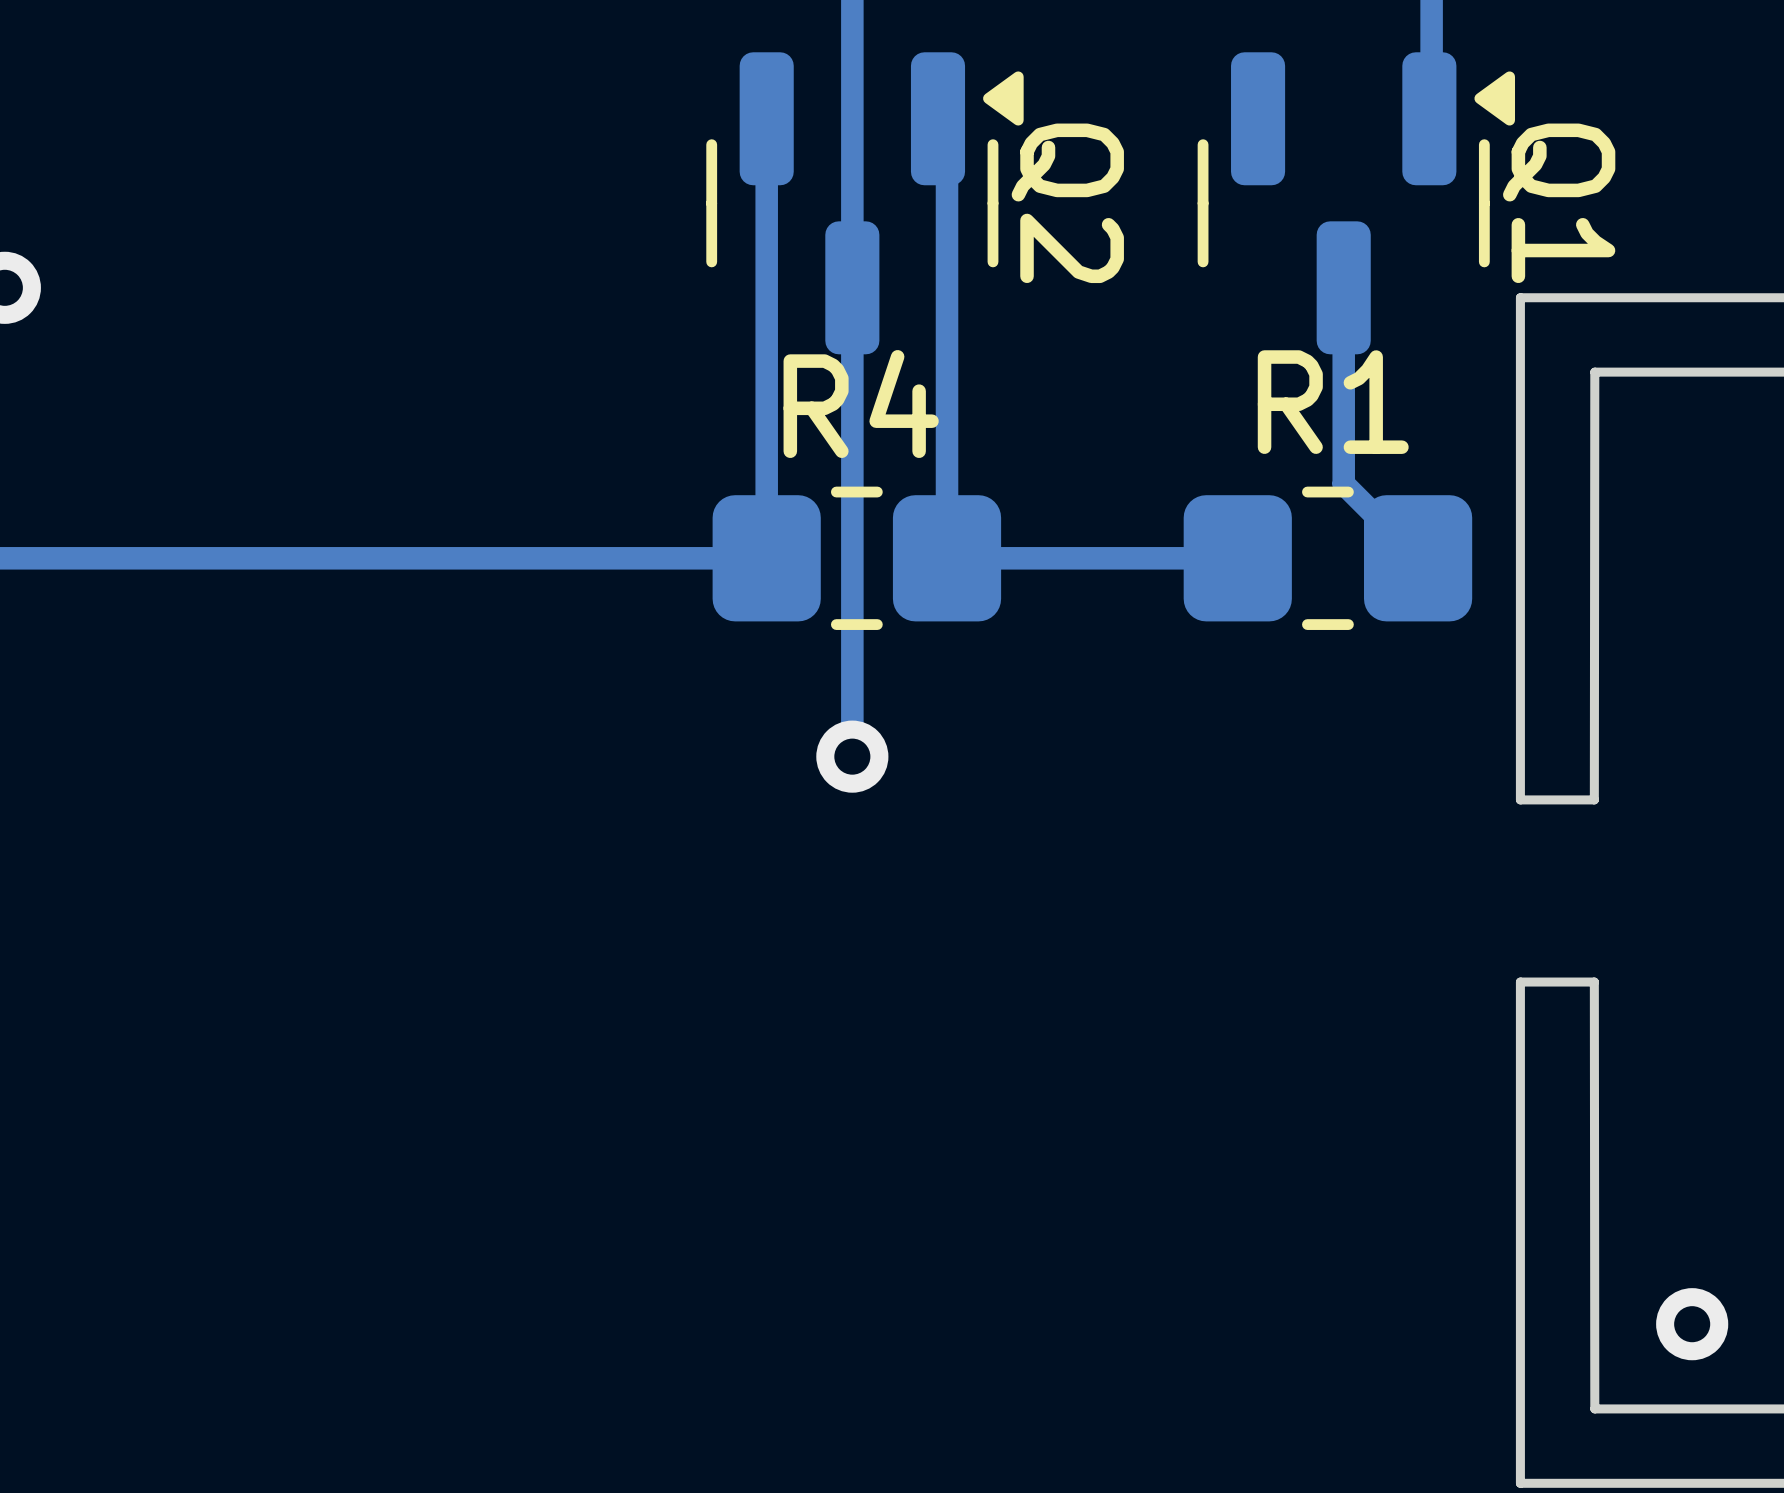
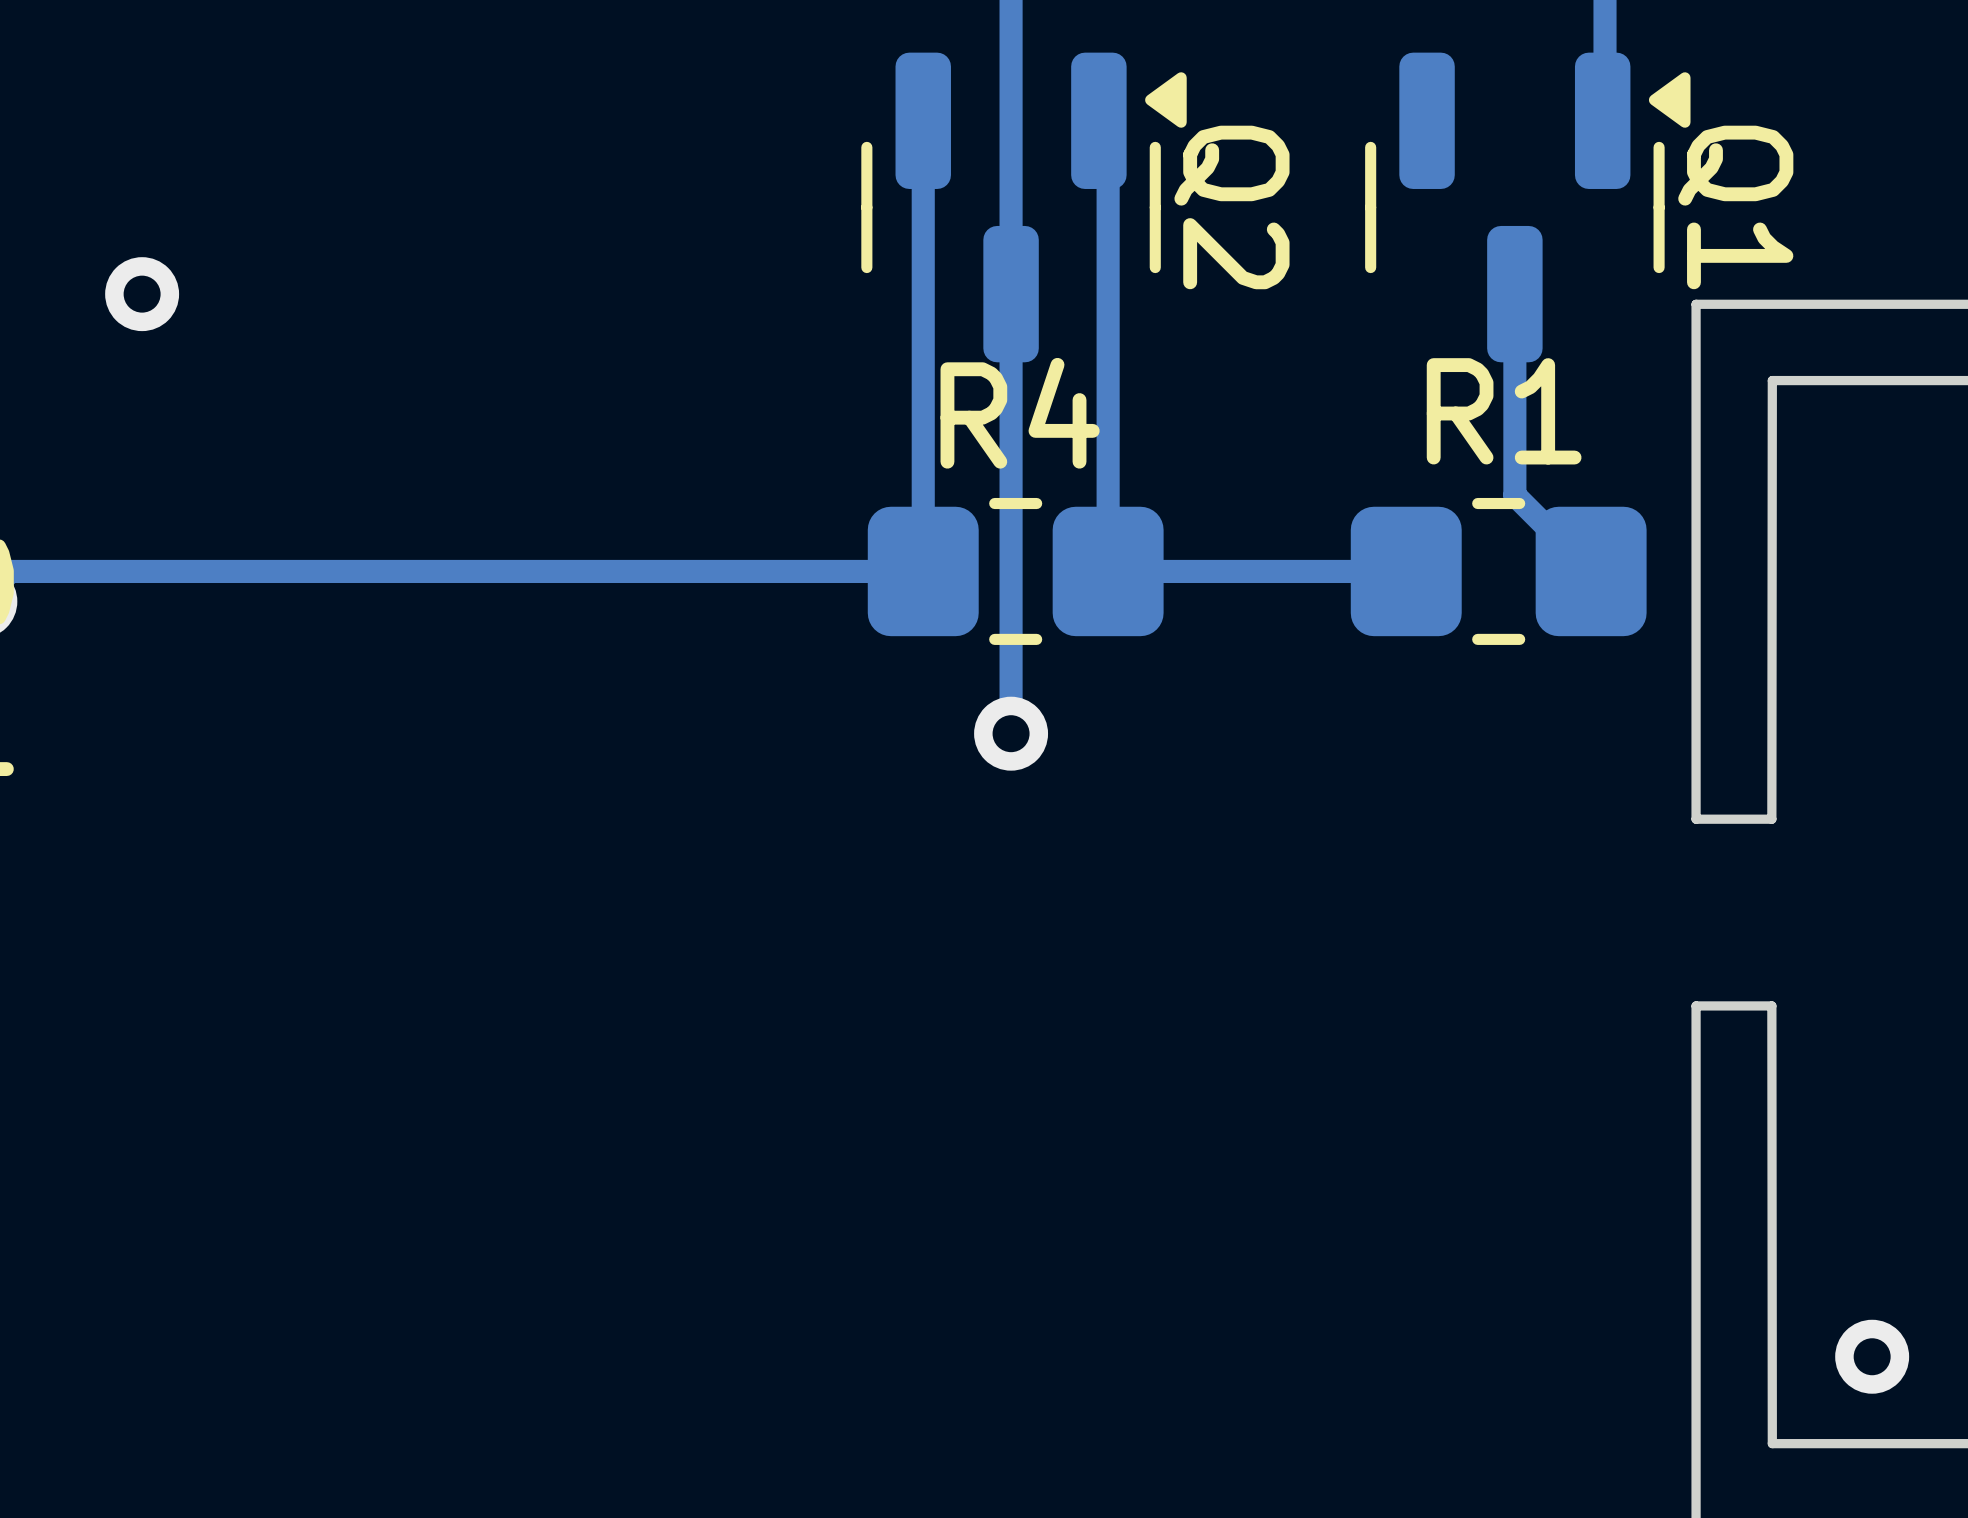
via position: (852, 756) -> (1011, 733)

